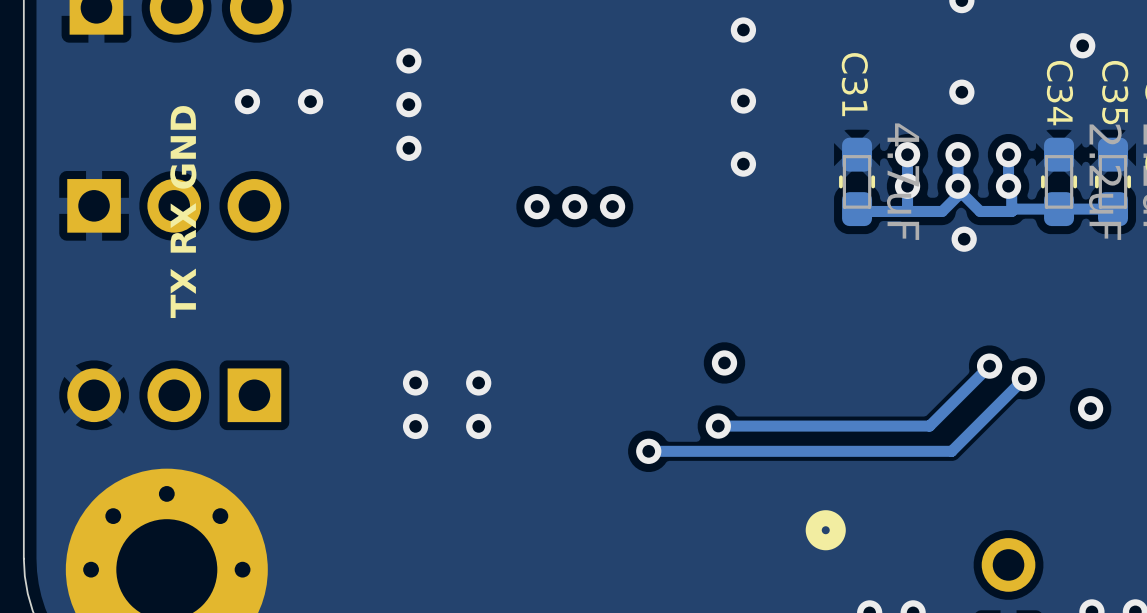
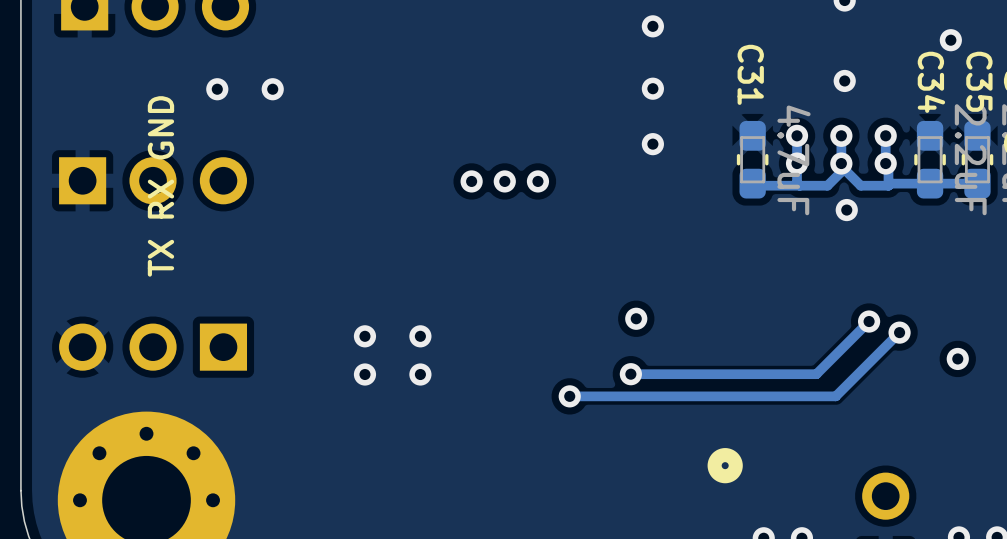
via: (408, 60) -> none
via: (408, 104) -> none
via: (408, 148) -> none

